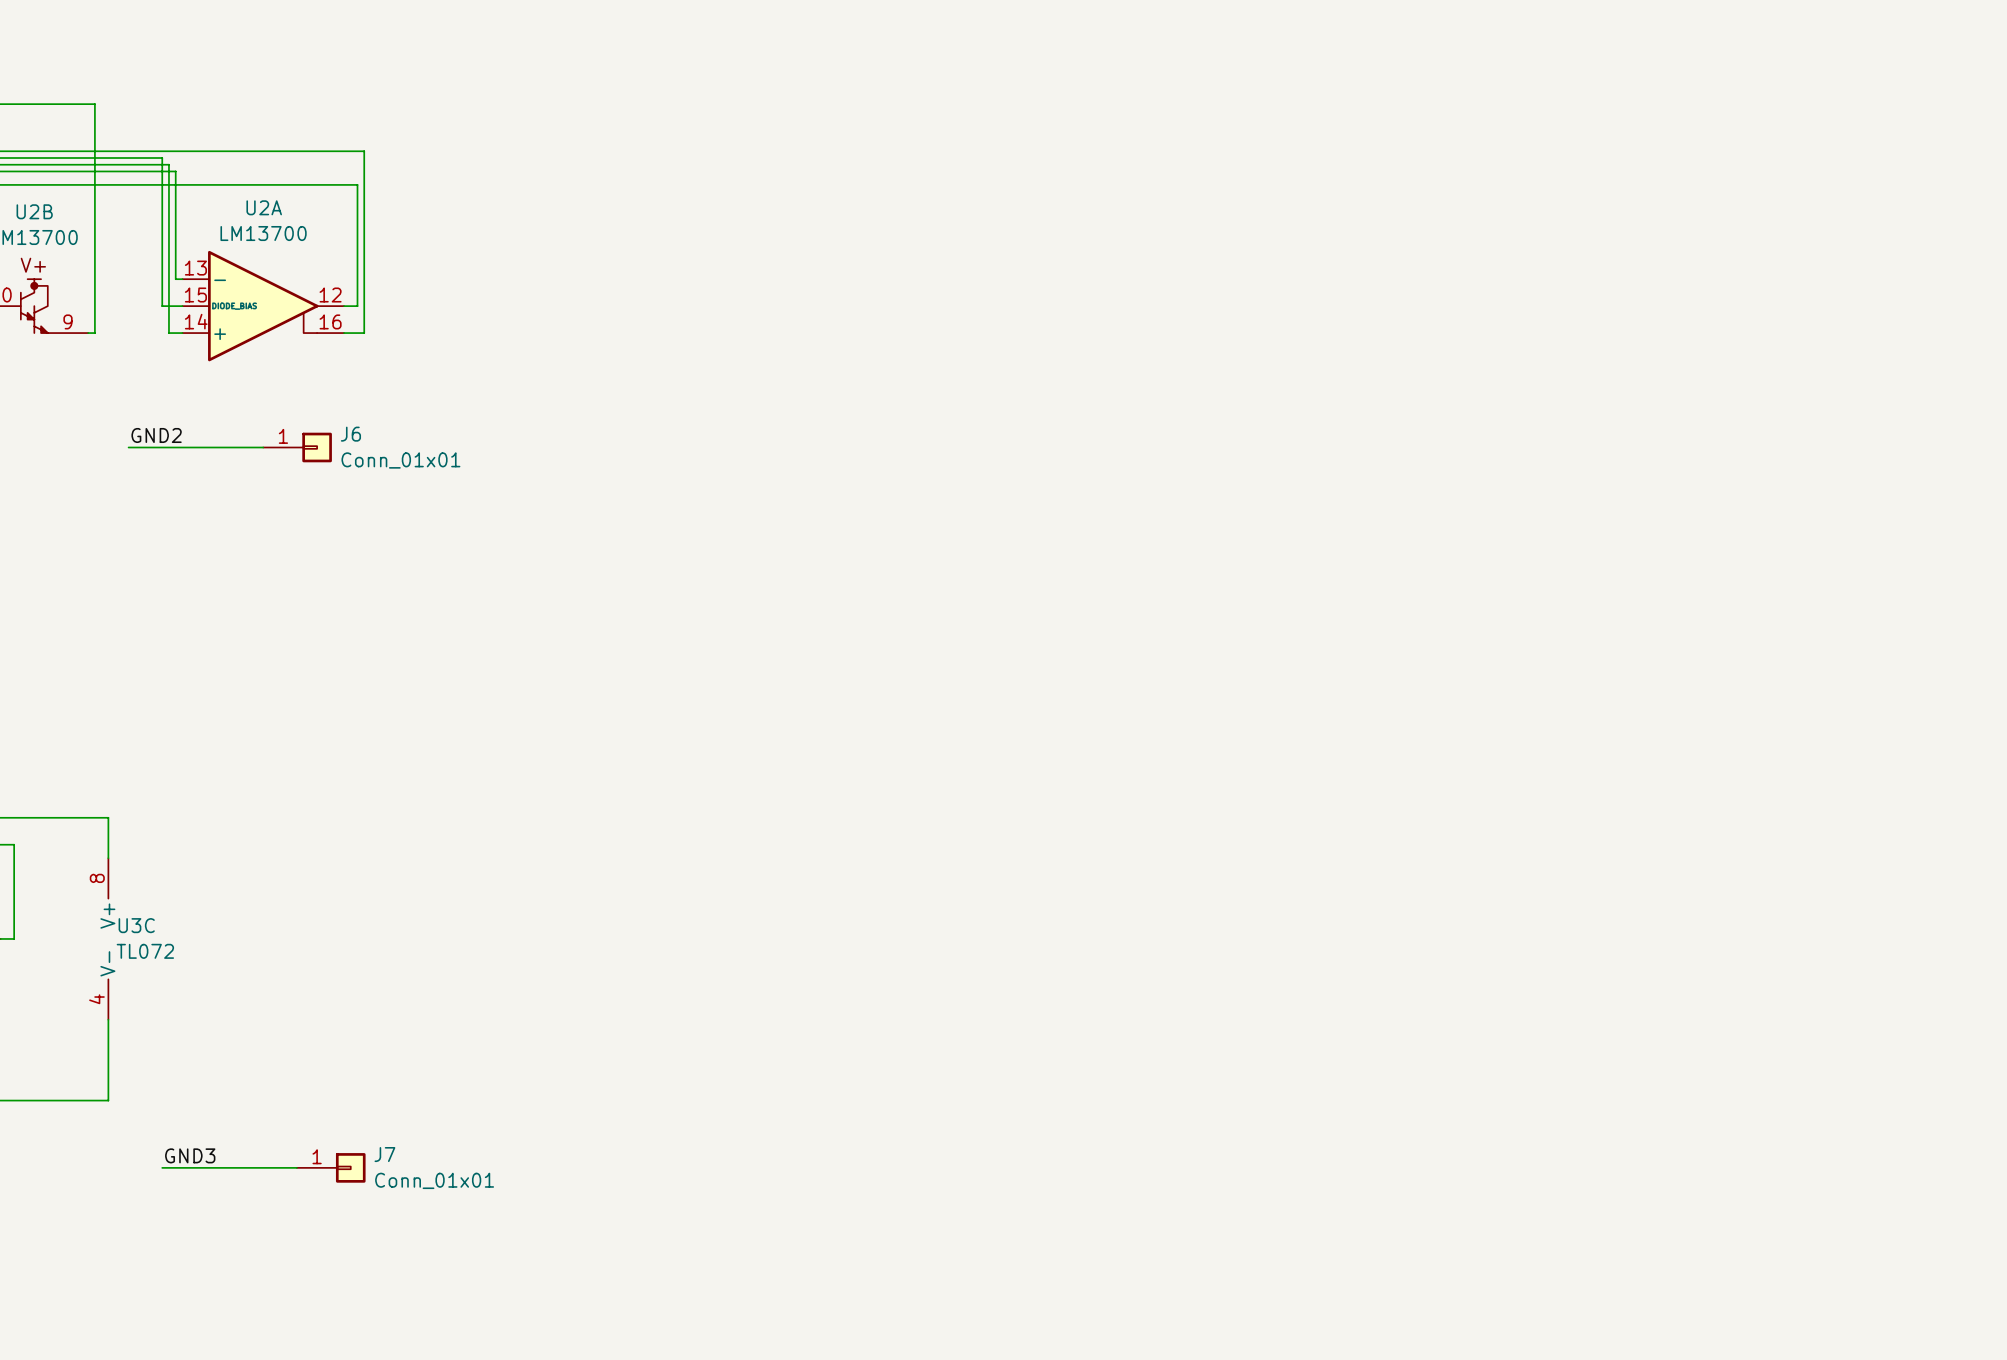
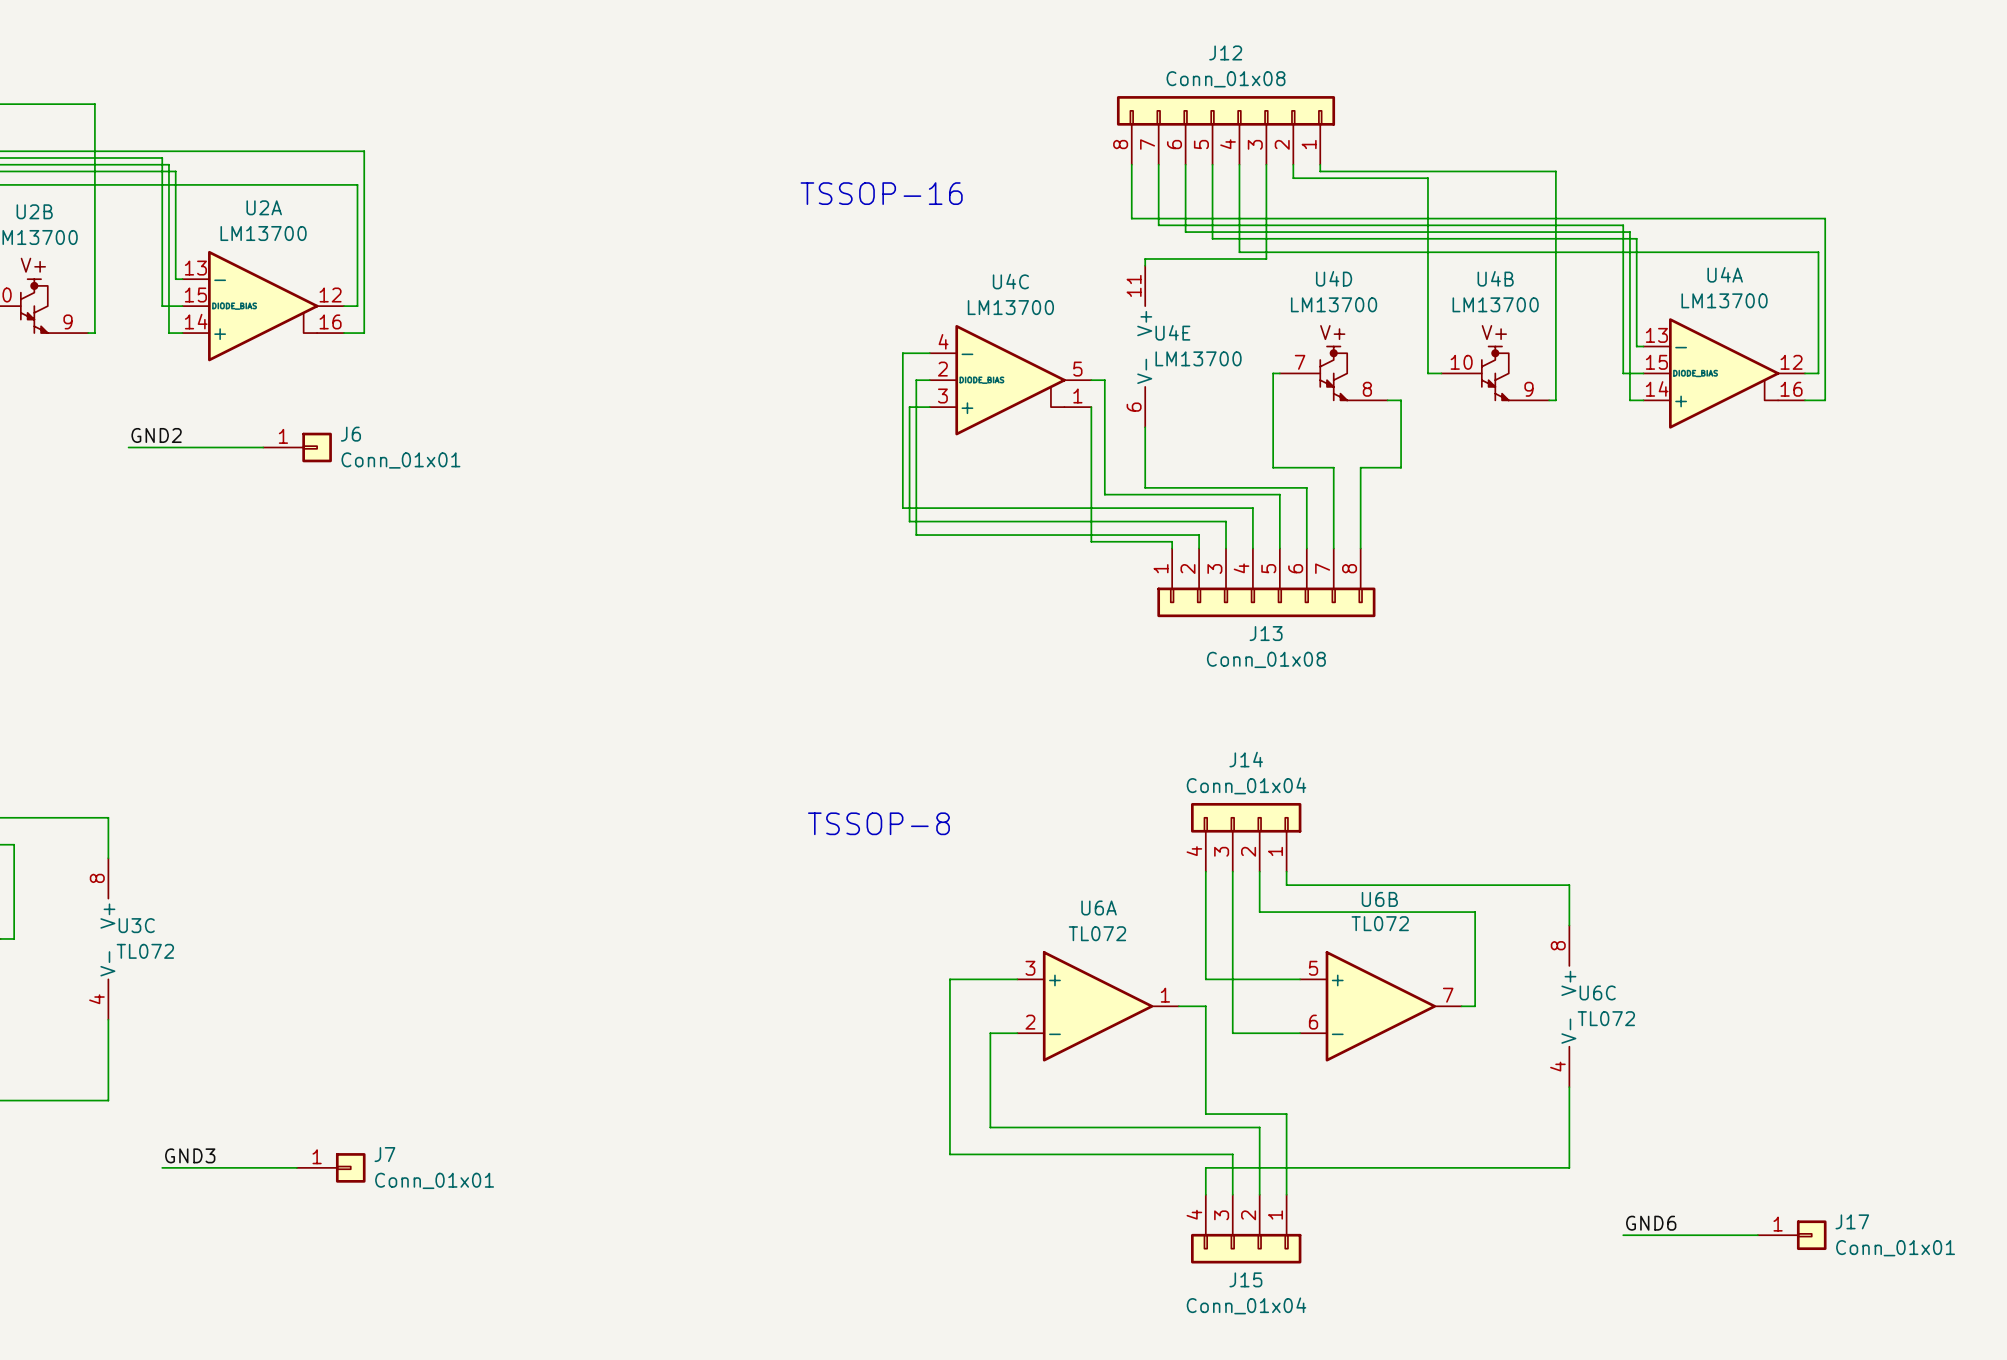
J12: none -> Conn_01x08 (1226, 130)
wire: none -> (1131, 164) (1131, 218) (1825, 218) (1825, 400) (1805, 400)
wire: none -> (1158, 164) (1158, 225) (1623, 225) (1623, 373) (1643, 373)
wire: none -> (1185, 164) (1185, 232) (1629, 232) (1629, 400) (1643, 400)
wire: none -> (1212, 164) (1212, 238) (1636, 238) (1636, 346) (1643, 346)
wire: none -> (1239, 164) (1239, 252) (1818, 252) (1818, 373) (1805, 373)
wire: none -> (1266, 164) (1266, 258) (1145, 258) (1145, 265)
wire: none -> (1293, 164) (1293, 178) (1427, 178) (1427, 373) (1441, 373)
wire: none -> (1320, 164) (1320, 171) (1555, 171) (1555, 400) (1549, 400)
text: none -> TSSOP-16 (881, 193)
U4E: none -> LM13700 (1145, 346)
wire: none -> (929, 353) (902, 353) (902, 508) (1252, 508) (1252, 548)
wire: none -> (1279, 373) (1273, 373) (1273, 467) (1333, 467) (1333, 548)
U4D: none -> LM13700 (1333, 373)
U4B: none -> LM13700 (1495, 373)
U4A: none -> LM13700 (1724, 373)
wire: none -> (929, 380) (916, 380) (916, 535) (1199, 535) (1199, 548)
U4C: none -> LM13700 (1010, 380)
wire: none -> (1091, 380) (1104, 380) (1104, 494) (1279, 494) (1279, 548)
wire: none -> (1387, 400) (1401, 400) (1401, 467) (1360, 467) (1360, 548)
wire: none -> (929, 407) (909, 407) (909, 521) (1226, 521) (1226, 548)
wire: none -> (1091, 407) (1091, 541) (1172, 541) (1172, 548)
wire: none -> (1145, 427) (1145, 487) (1306, 487) (1306, 548)
J13: none -> Conn_01x08 (1266, 582)
text: none -> TSSOP-8 (878, 823)
J14: none -> Conn_01x04 (1246, 837)
wire: none -> (1205, 871) (1205, 979) (1300, 979)
wire: none -> (1232, 871) (1232, 1033) (1300, 1033)
wire: none -> (1259, 871) (1259, 912) (1475, 912) (1475, 1006) (1461, 1006)
wire: none -> (1286, 871) (1286, 885) (1569, 885) (1569, 925)
wire: none -> (1017, 979) (949, 979) (949, 1154) (1232, 1154) (1232, 1194)
U6A: none -> TL072 (1098, 1006)
wire: none -> (1178, 1006) (1205, 1006) (1205, 1114) (1286, 1114) (1286, 1194)
U6B: none -> TL072 (1380, 1006)
U6C: none -> TL072 (1569, 1006)
wire: none -> (1017, 1033) (990, 1033) (990, 1127) (1259, 1127) (1259, 1194)
wire: none -> (1569, 1087) (1569, 1167) (1205, 1167) (1205, 1194)
label: none -> GND6 (1651, 1223)
J15: none -> Conn_01x04 (1246, 1229)
wire: none -> (1623, 1235) (1757, 1235)
J17: none -> Conn_01x01 (1792, 1235)

